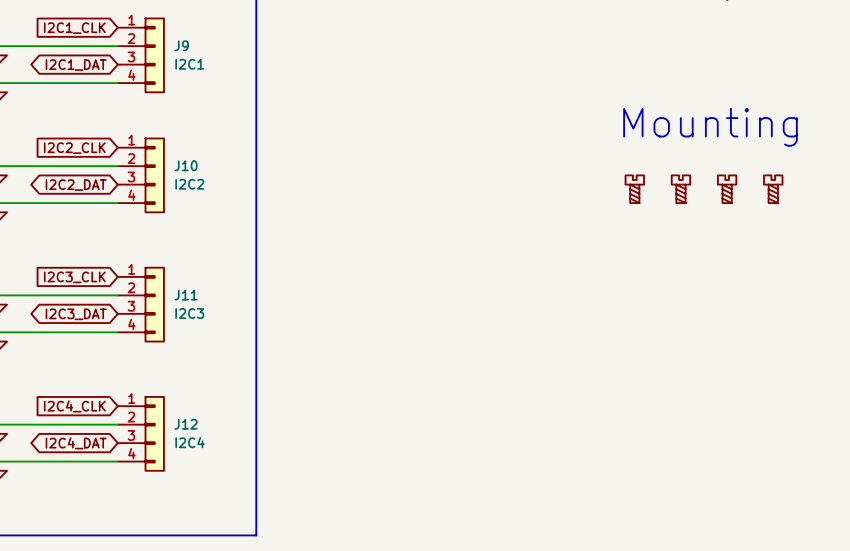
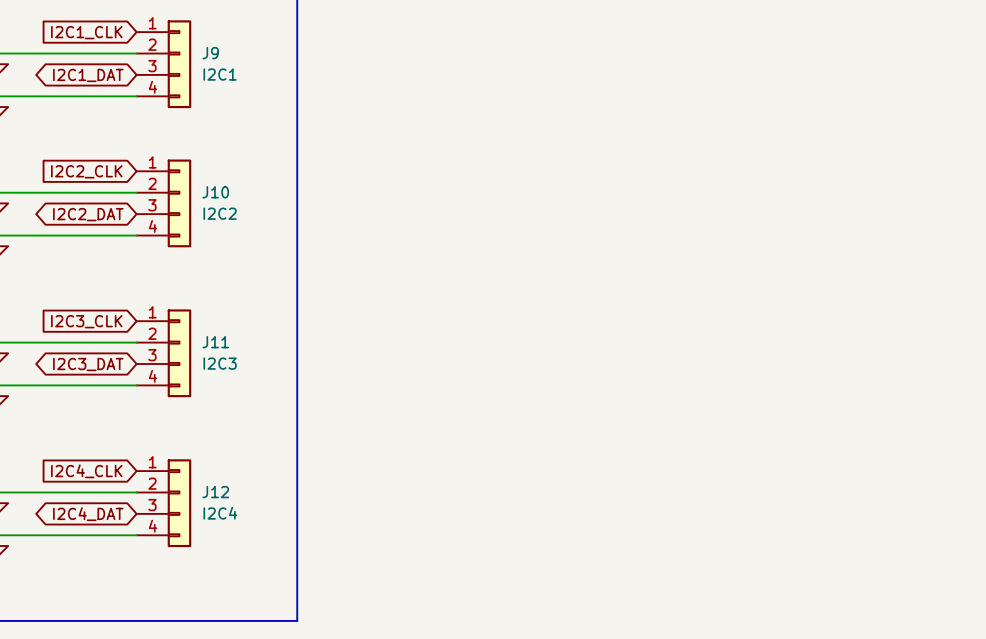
text: Mounting (710, 127) -> none
part: (634, 189) -> none
part: (680, 189) -> none
part: (727, 189) -> none
part: (773, 189) -> none

